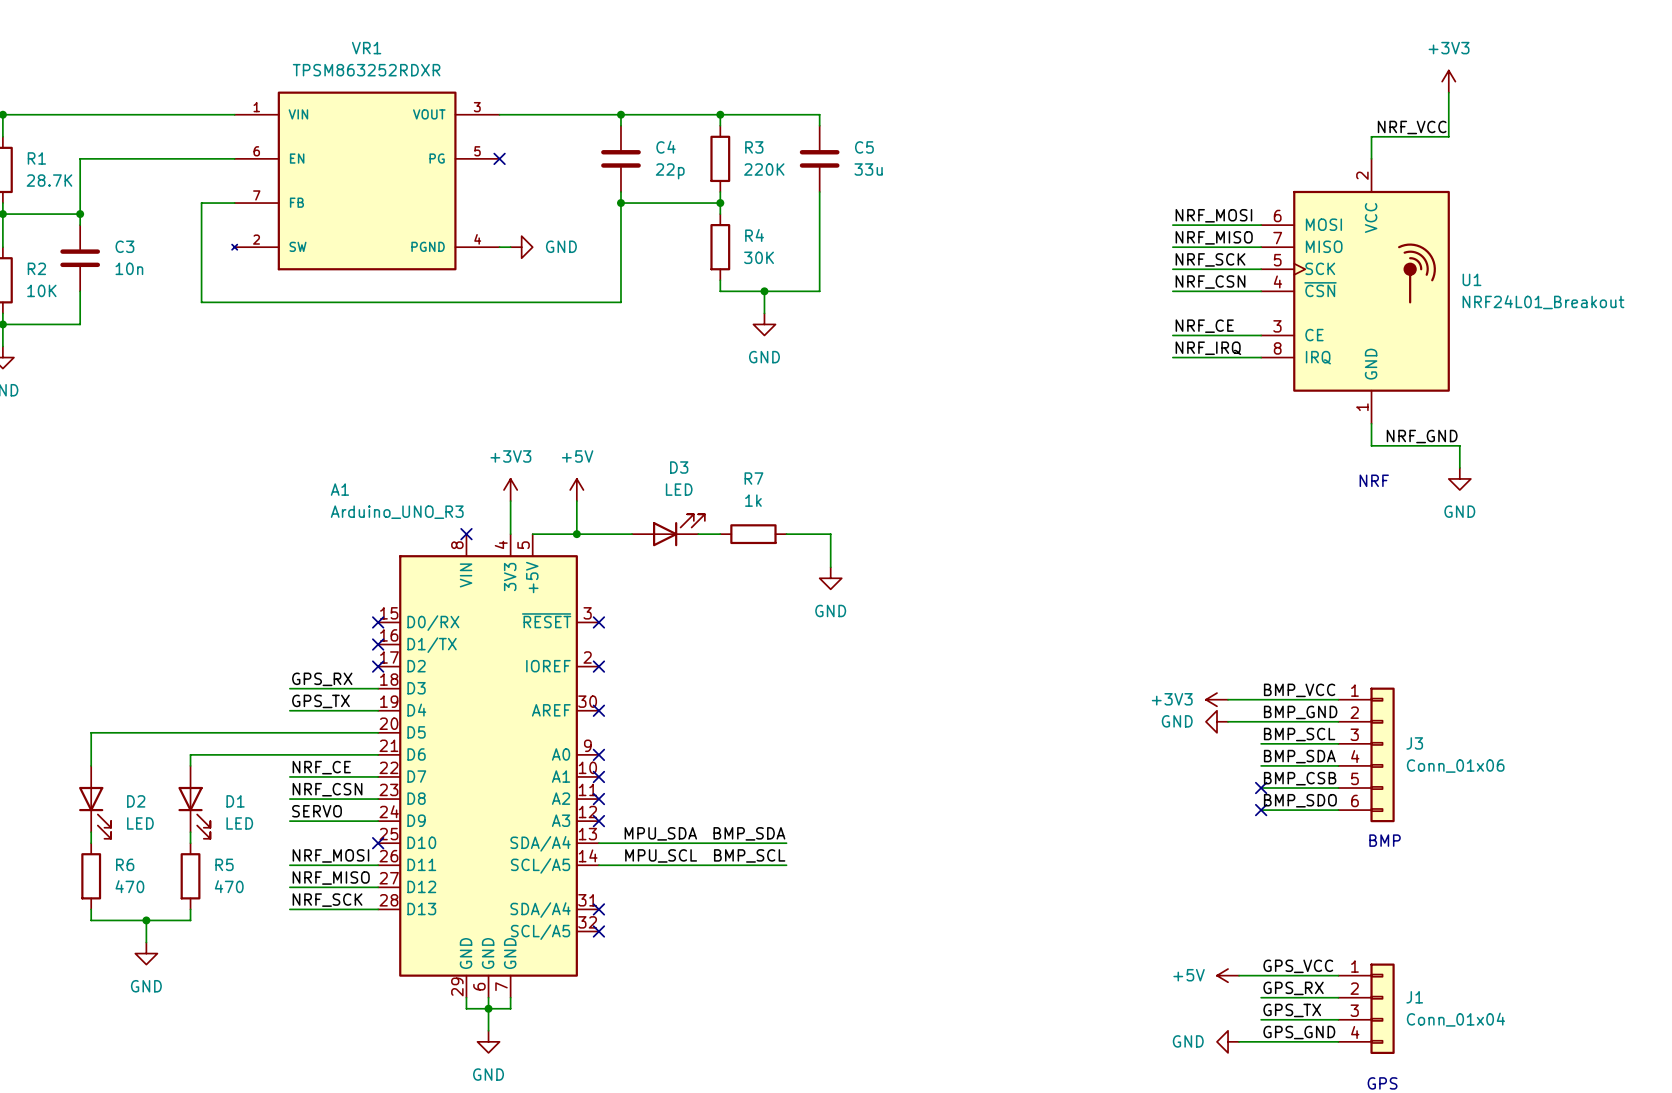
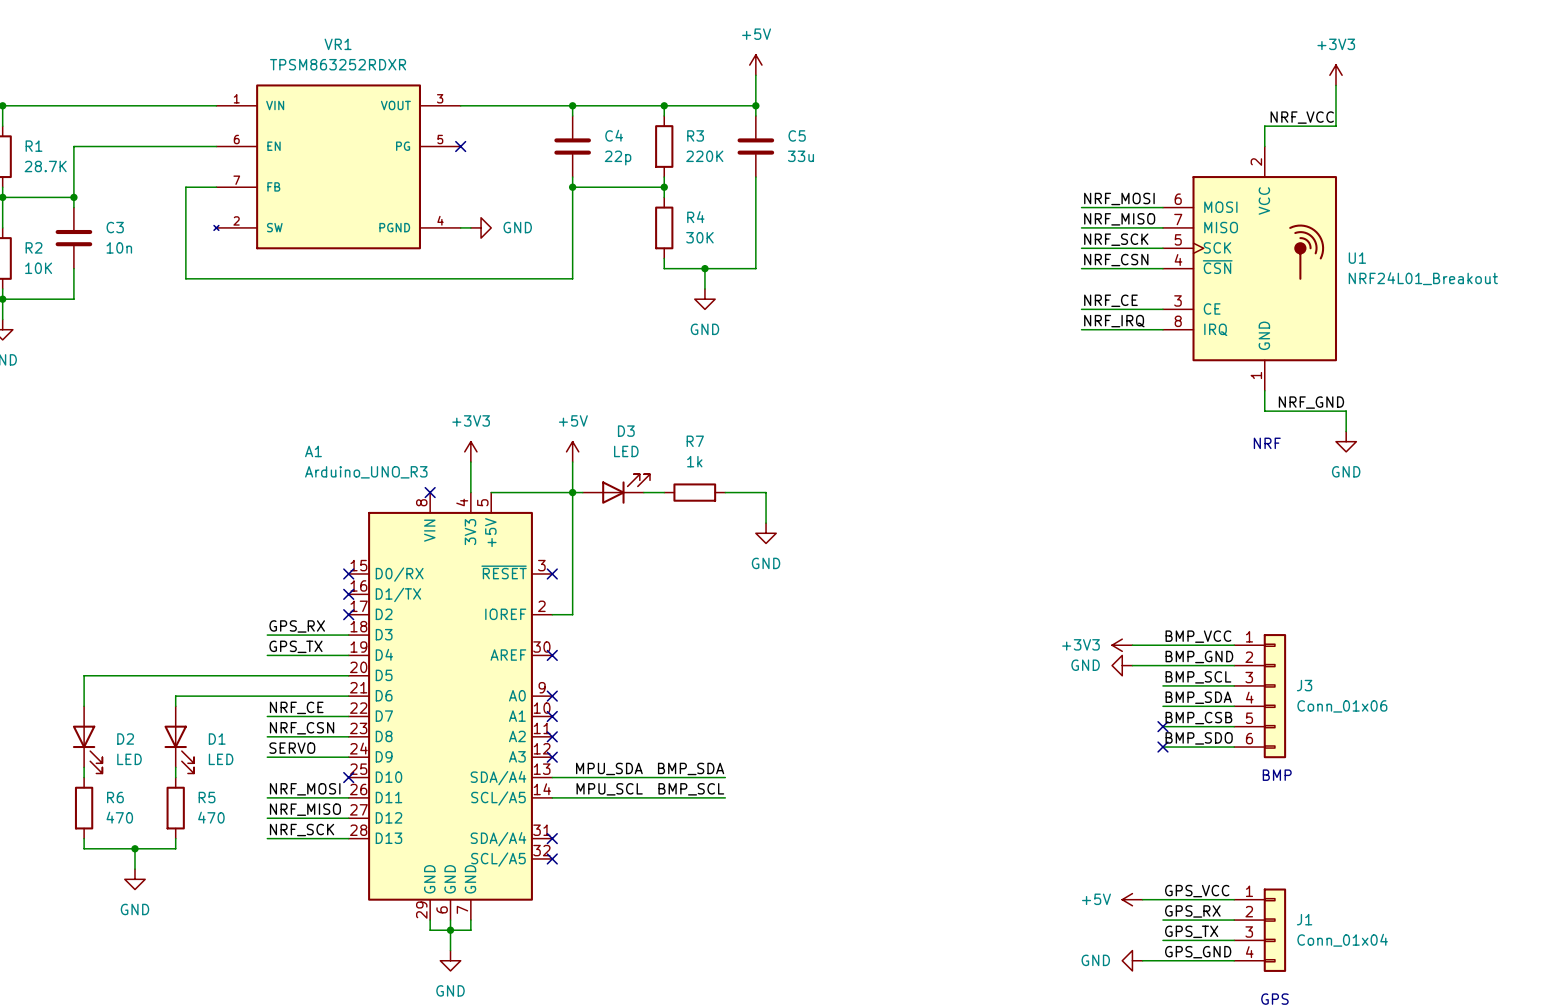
power symbol: none -> +5V (755, 65)
wire: none -> (755, 75) (755, 105)
junction: none -> (755, 105)
power symbol position: +5V (576, 490) -> +5V (572, 451)
wire: (576, 501) (576, 534) -> none
wire: none -> (572, 462) (572, 614) (552, 614)
junction position: (576, 534) -> (572, 492)
no-connect mark: (598, 666) -> none

